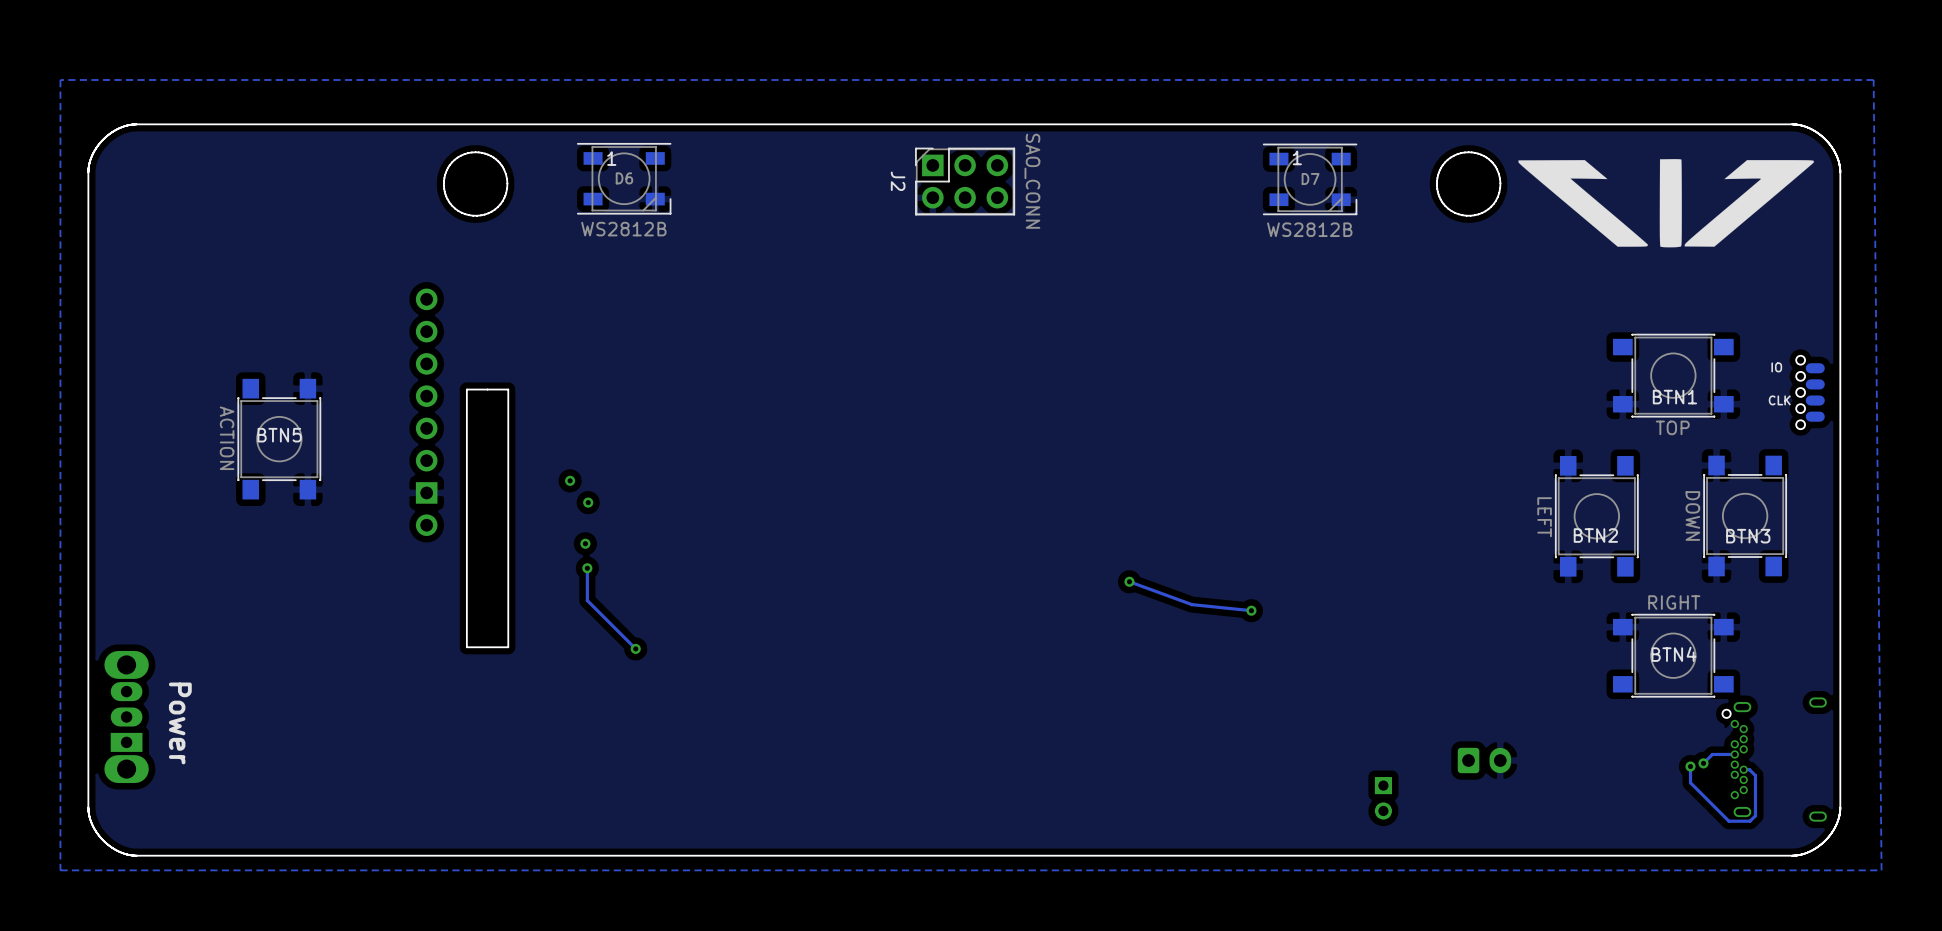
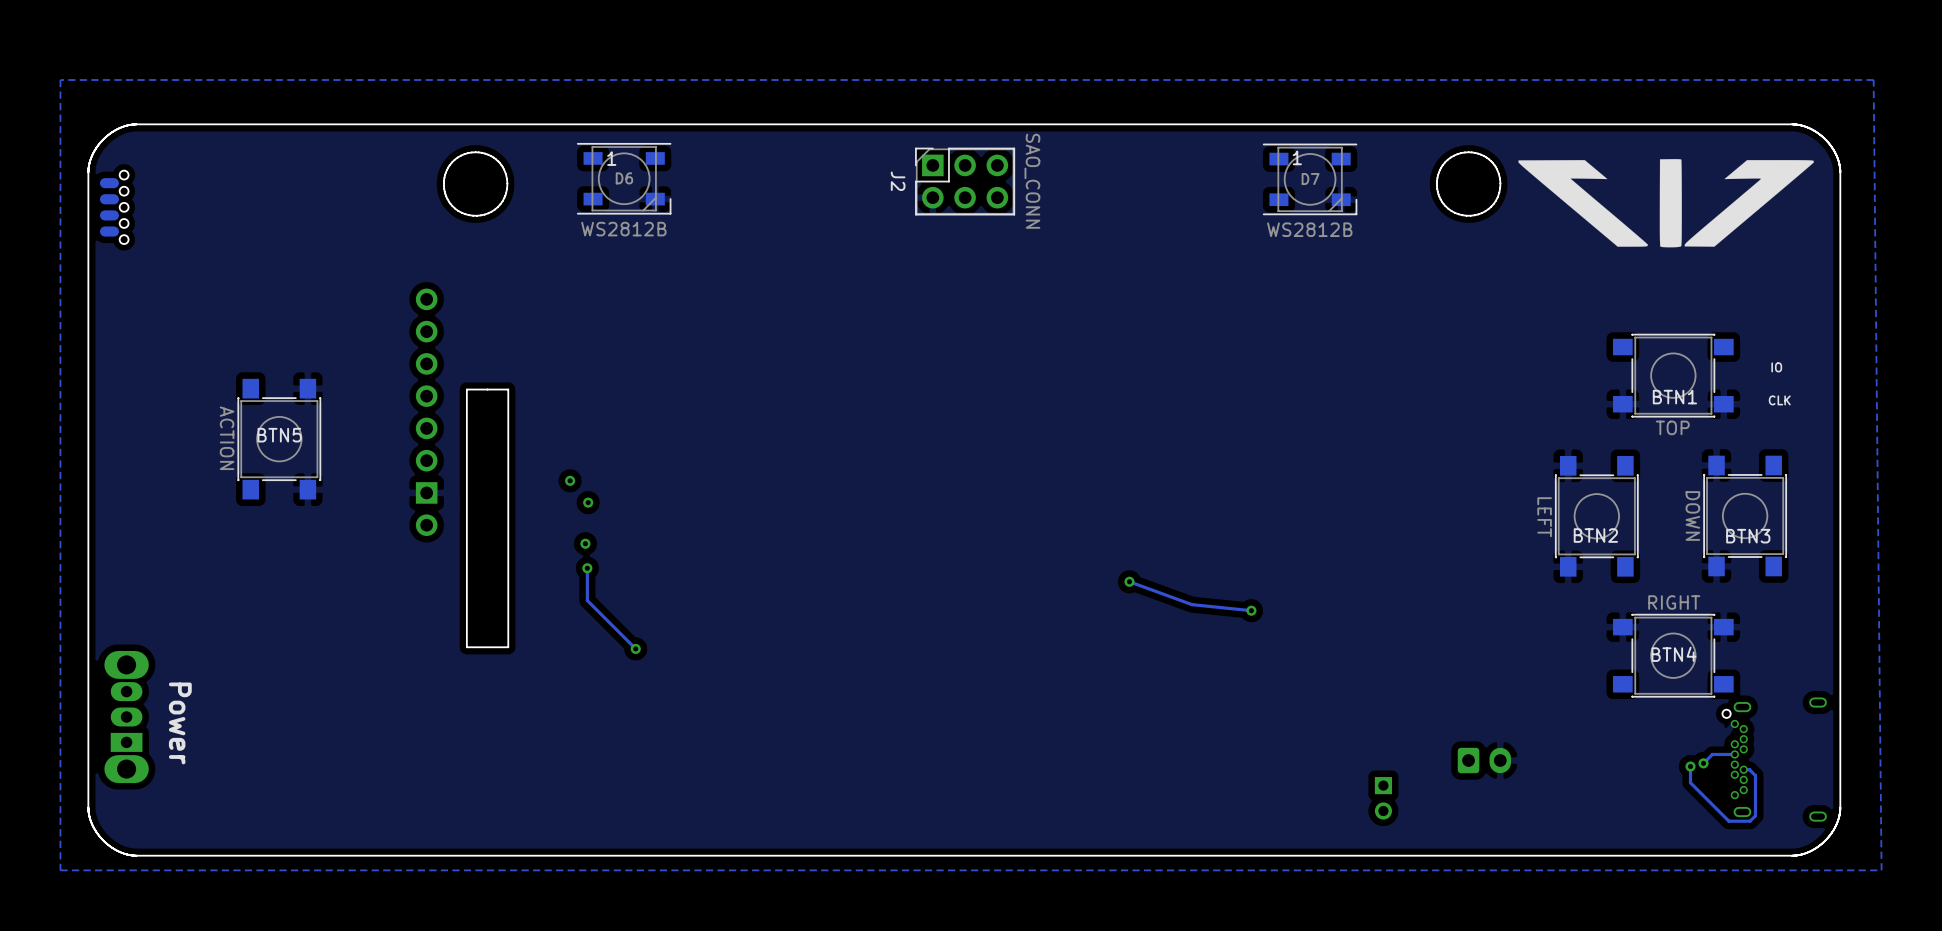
part: none -> (114, 207)
part: (1810, 392) -> none

